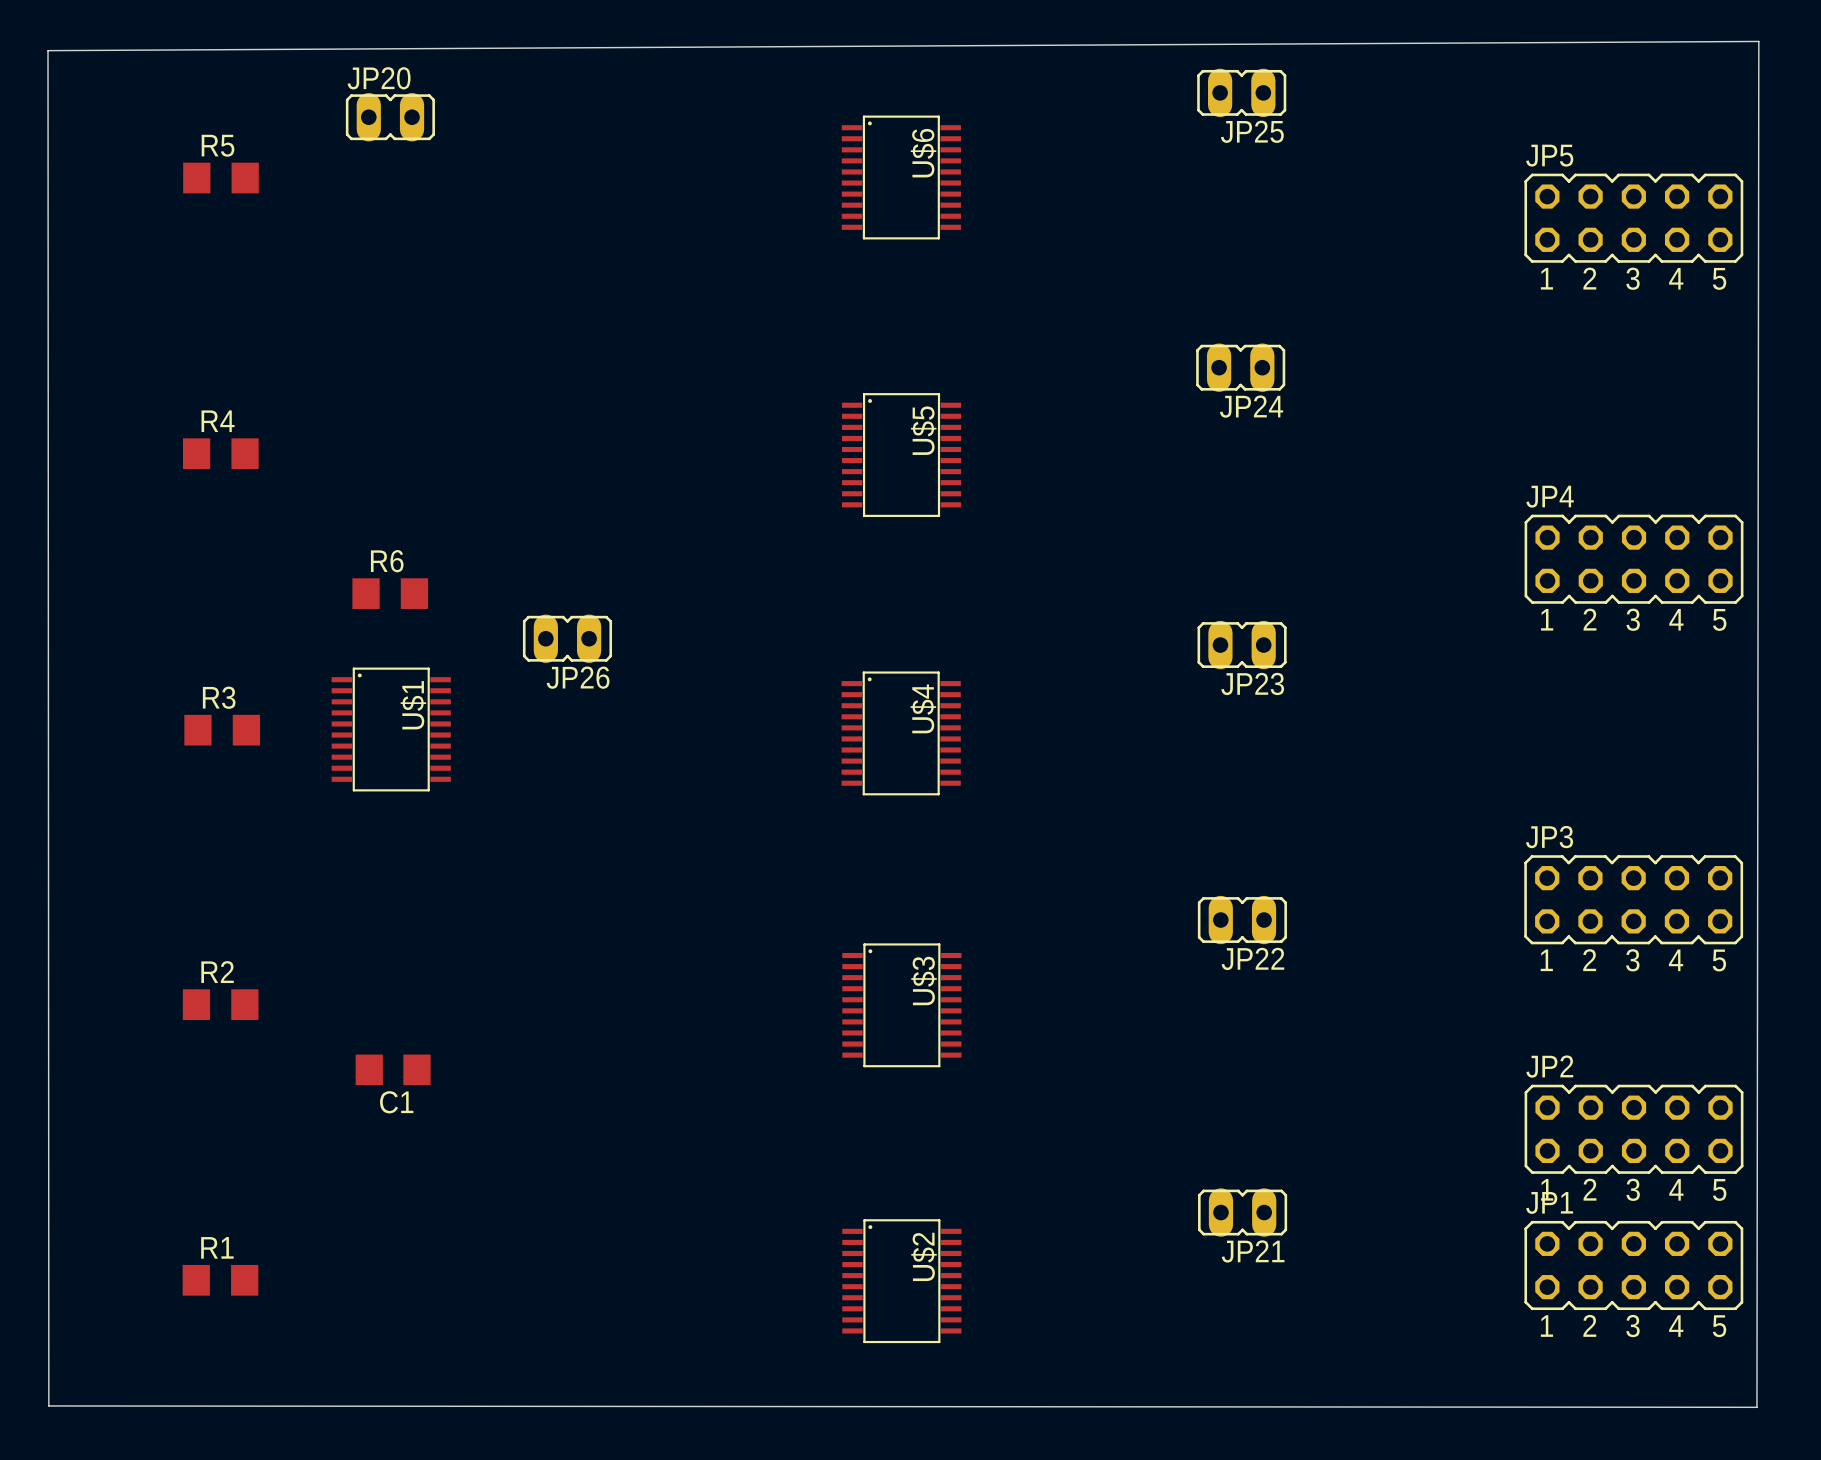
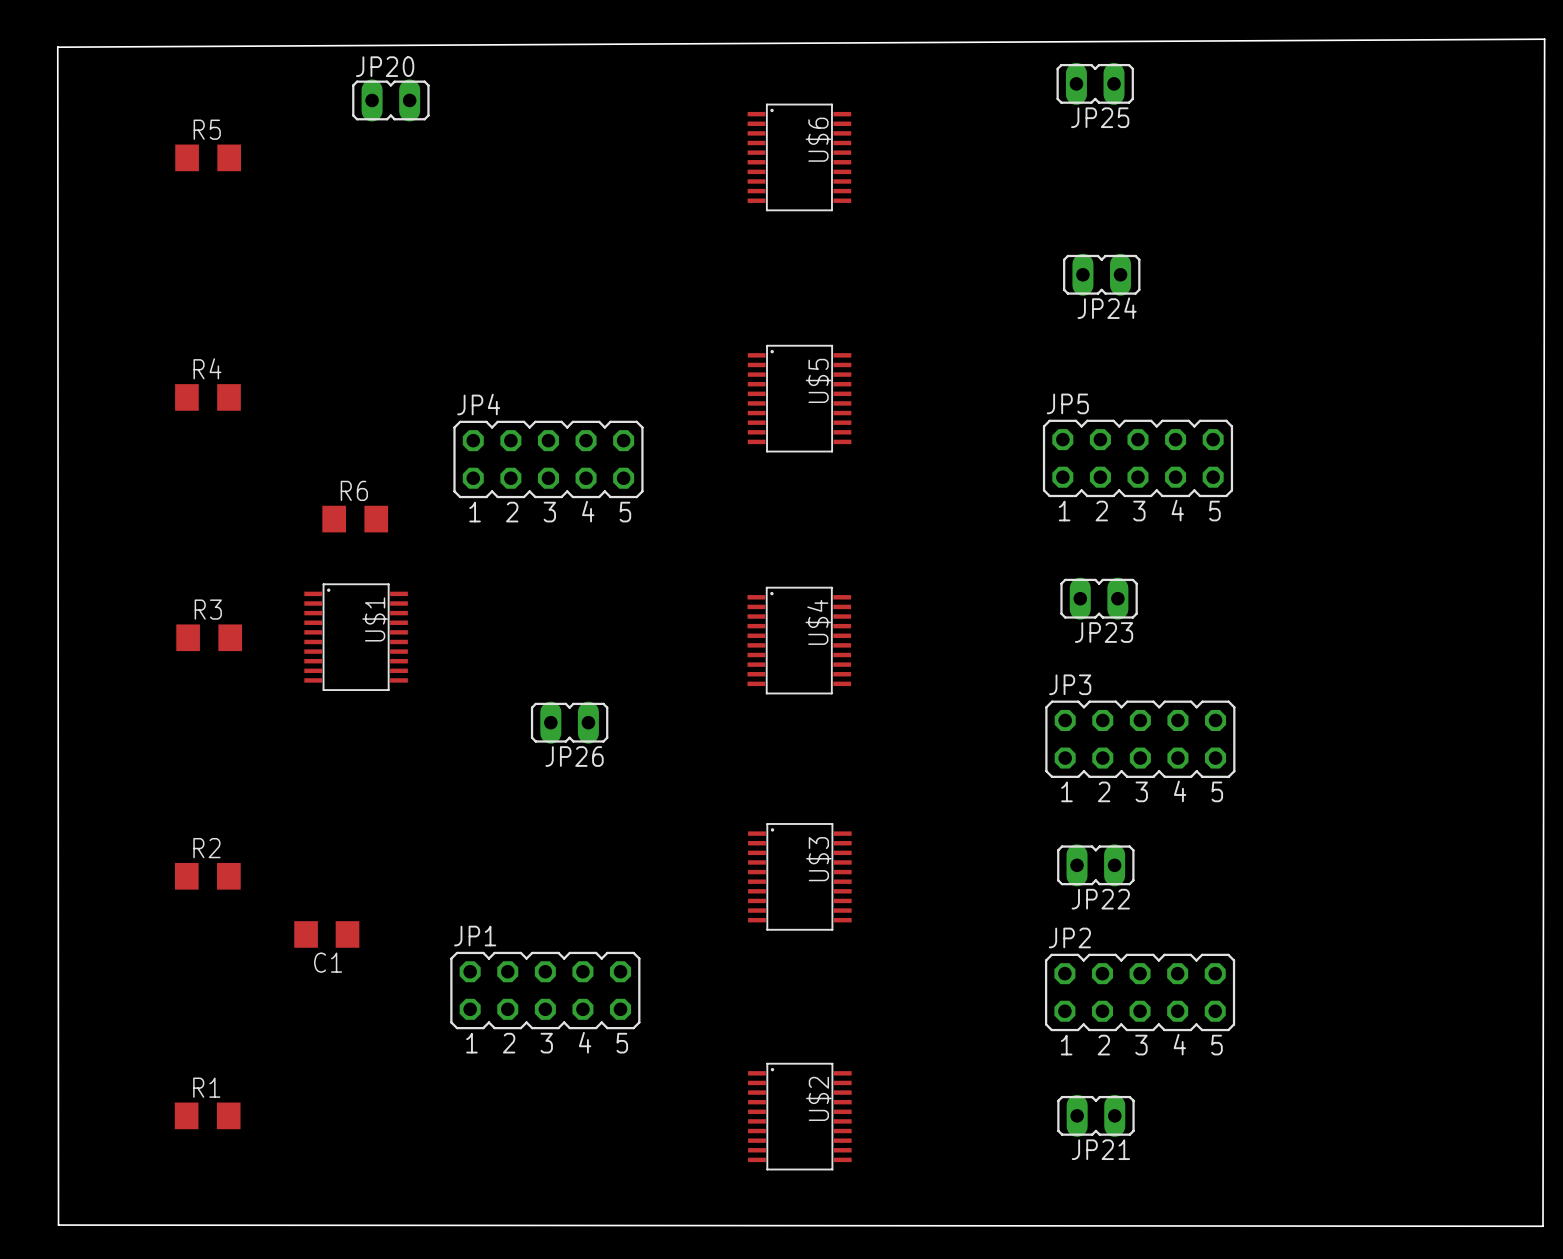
JP20 position: (390, 117) -> (390, 100)
JP5 position: (1633, 218) -> (1137, 458)
JP24 position: (1240, 367) -> (1101, 274)
JP4 position: (1634, 559) -> (548, 459)
JP26 position: (567, 638) -> (569, 722)
JP23 position: (1242, 645) -> (1099, 598)
JP3 position: (1633, 899) -> (1140, 739)
JP22 position: (1242, 920) -> (1095, 865)
C1 position: (393, 1069) -> (326, 934)
JP2 position: (1634, 1129) -> (1140, 992)
JP21 position: (1242, 1212) -> (1095, 1115)
JP1 position: (1633, 1265) -> (545, 990)

